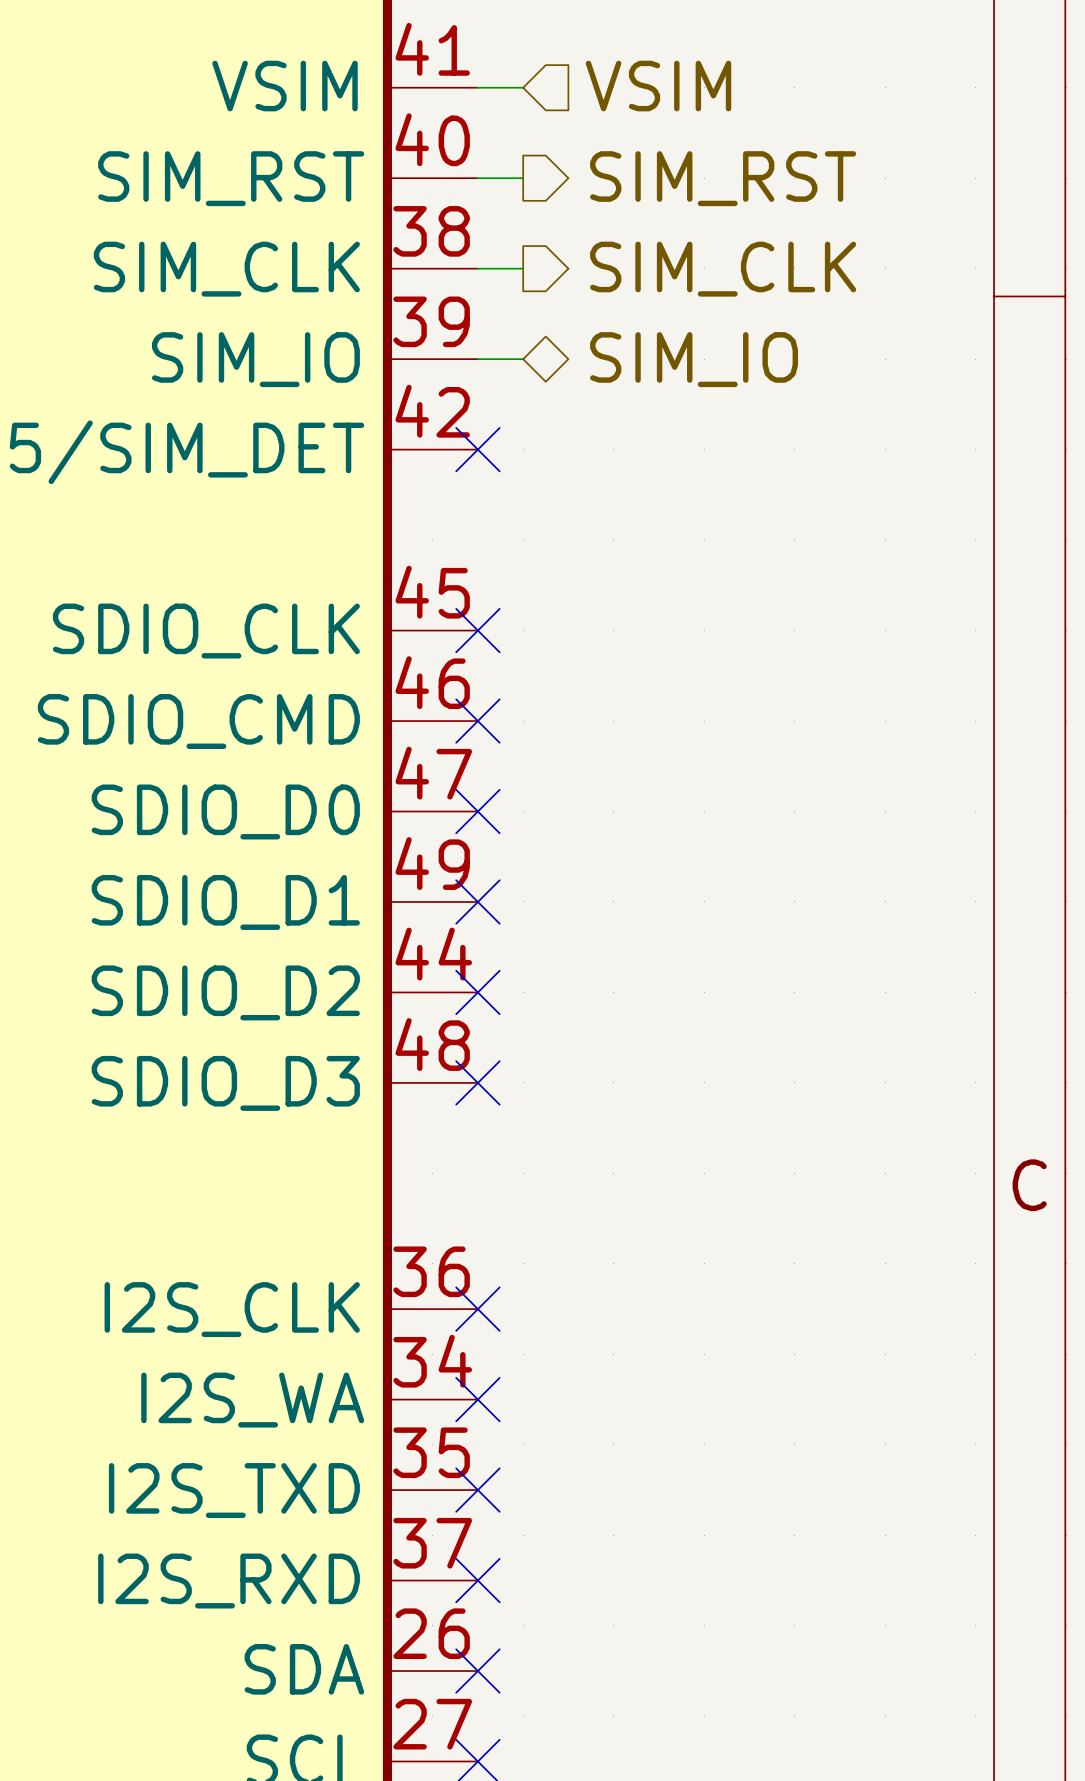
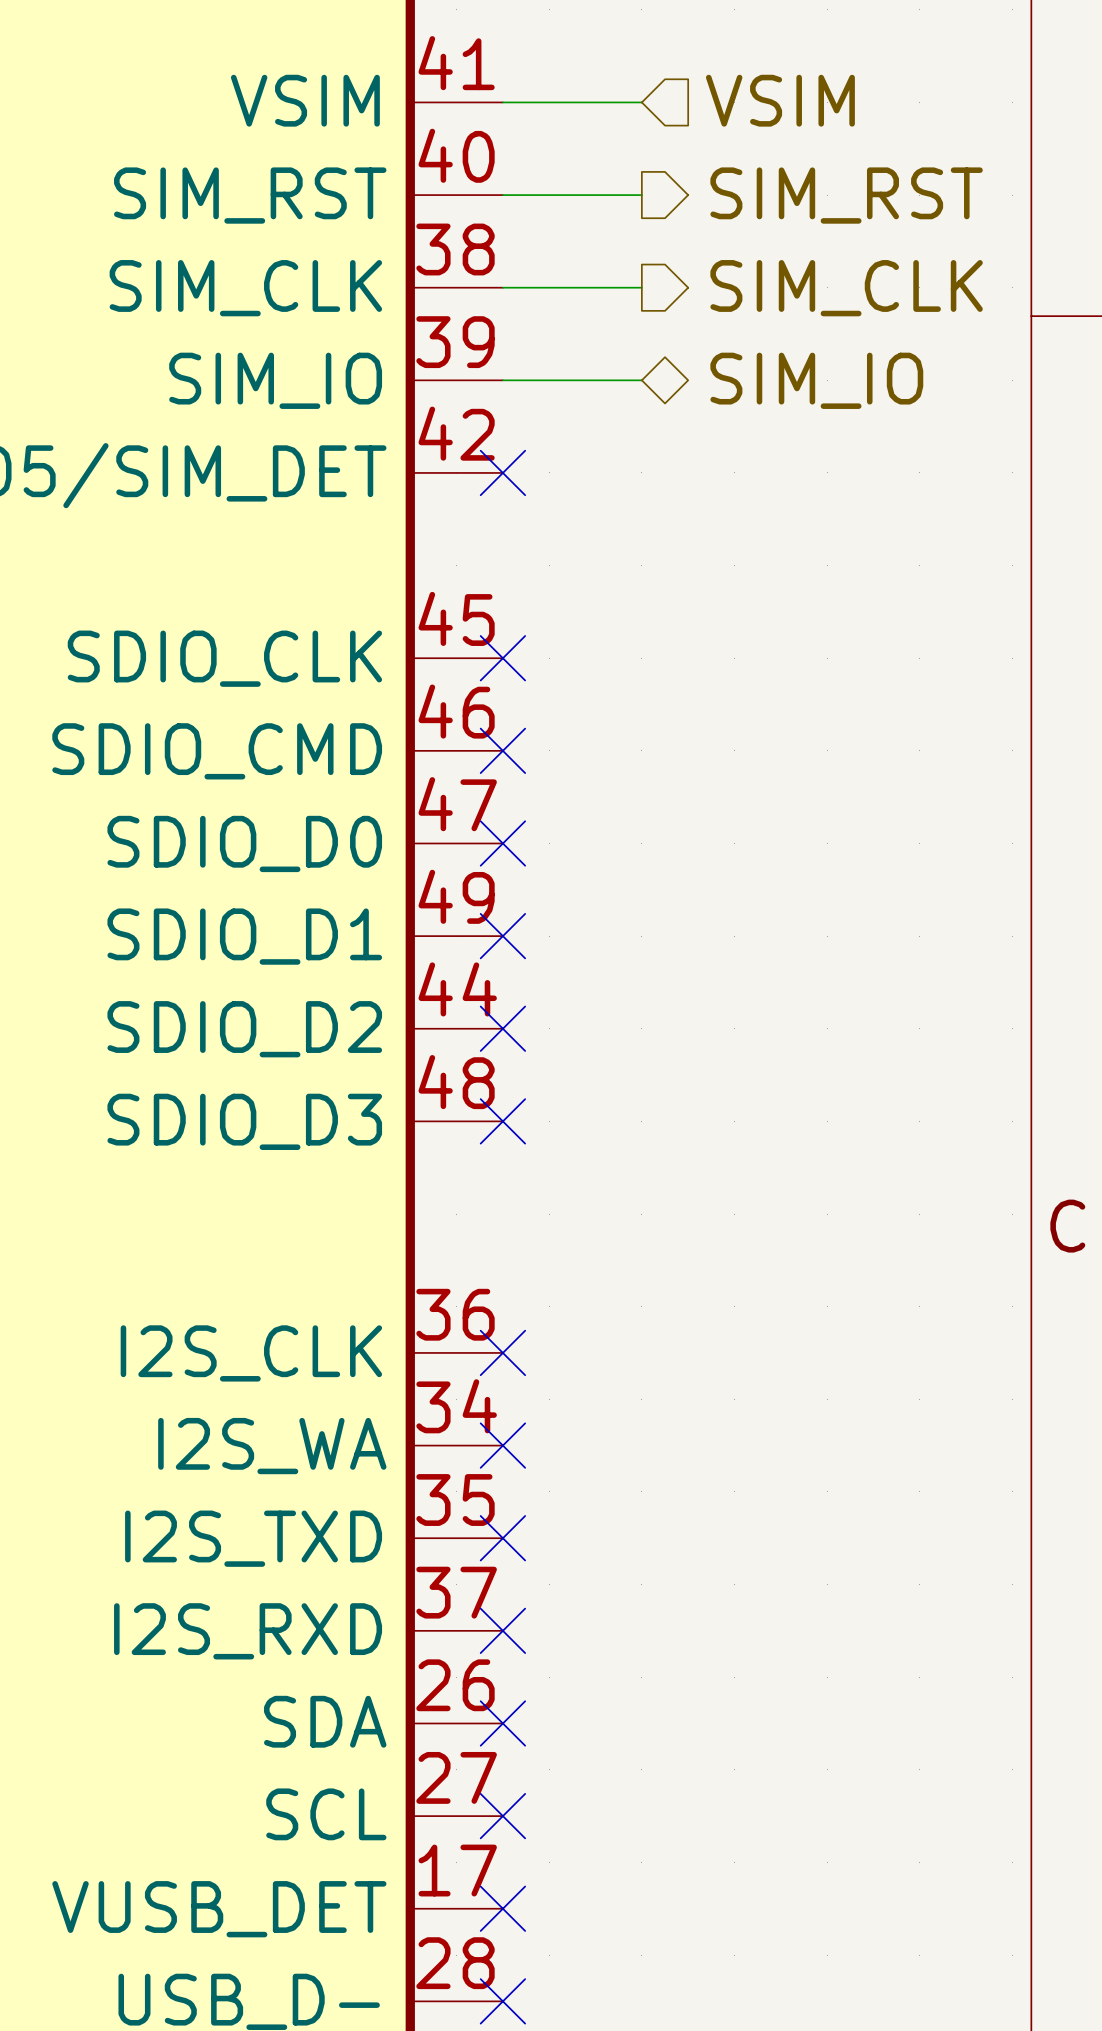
hierarchical label position: VSIM (658, 86) -> VSIM (780, 100)
wire: none -> (549, 102) (641, 102)
wire: none -> (549, 195) (641, 195)
hierarchical label position: SIM_RST (723, 178) -> SIM_RST (846, 195)
wire: none -> (549, 287) (641, 287)
hierarchical label position: SIM_CLK (723, 269) -> SIM_CLK (846, 288)
wire: none -> (549, 380) (641, 380)
hierarchical label position: SIM_IO (694, 359) -> SIM_IO (816, 380)

